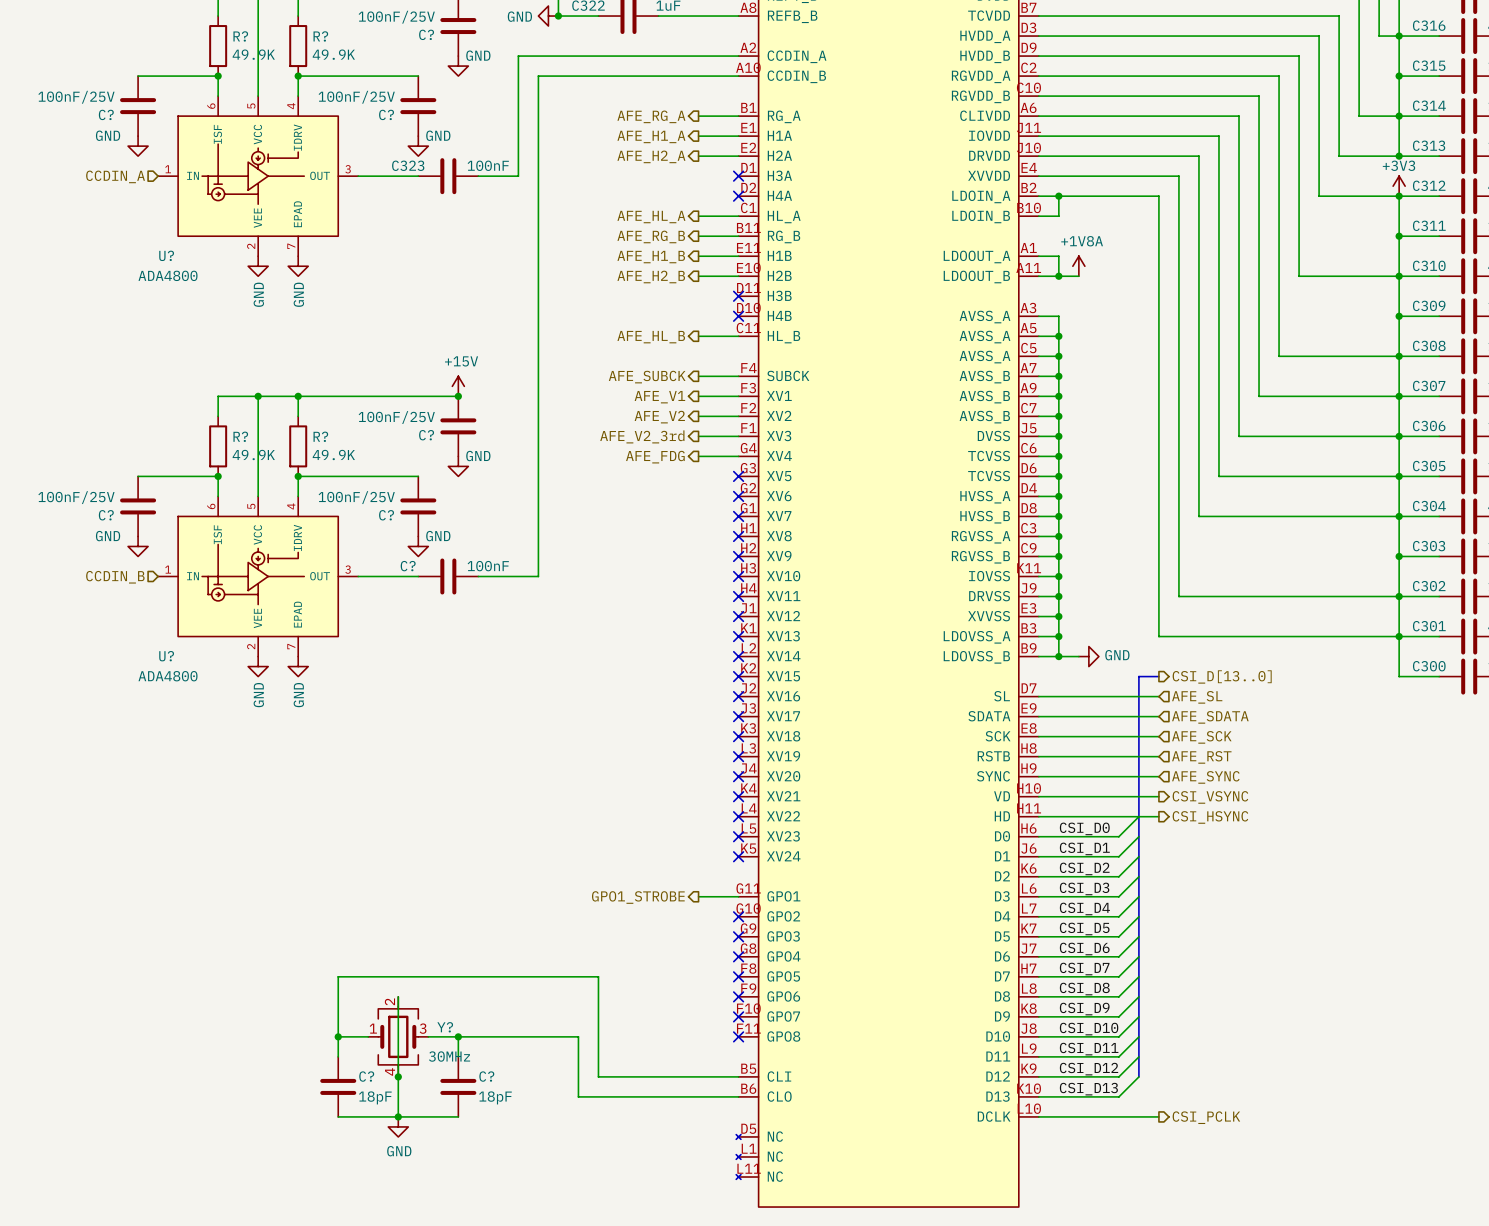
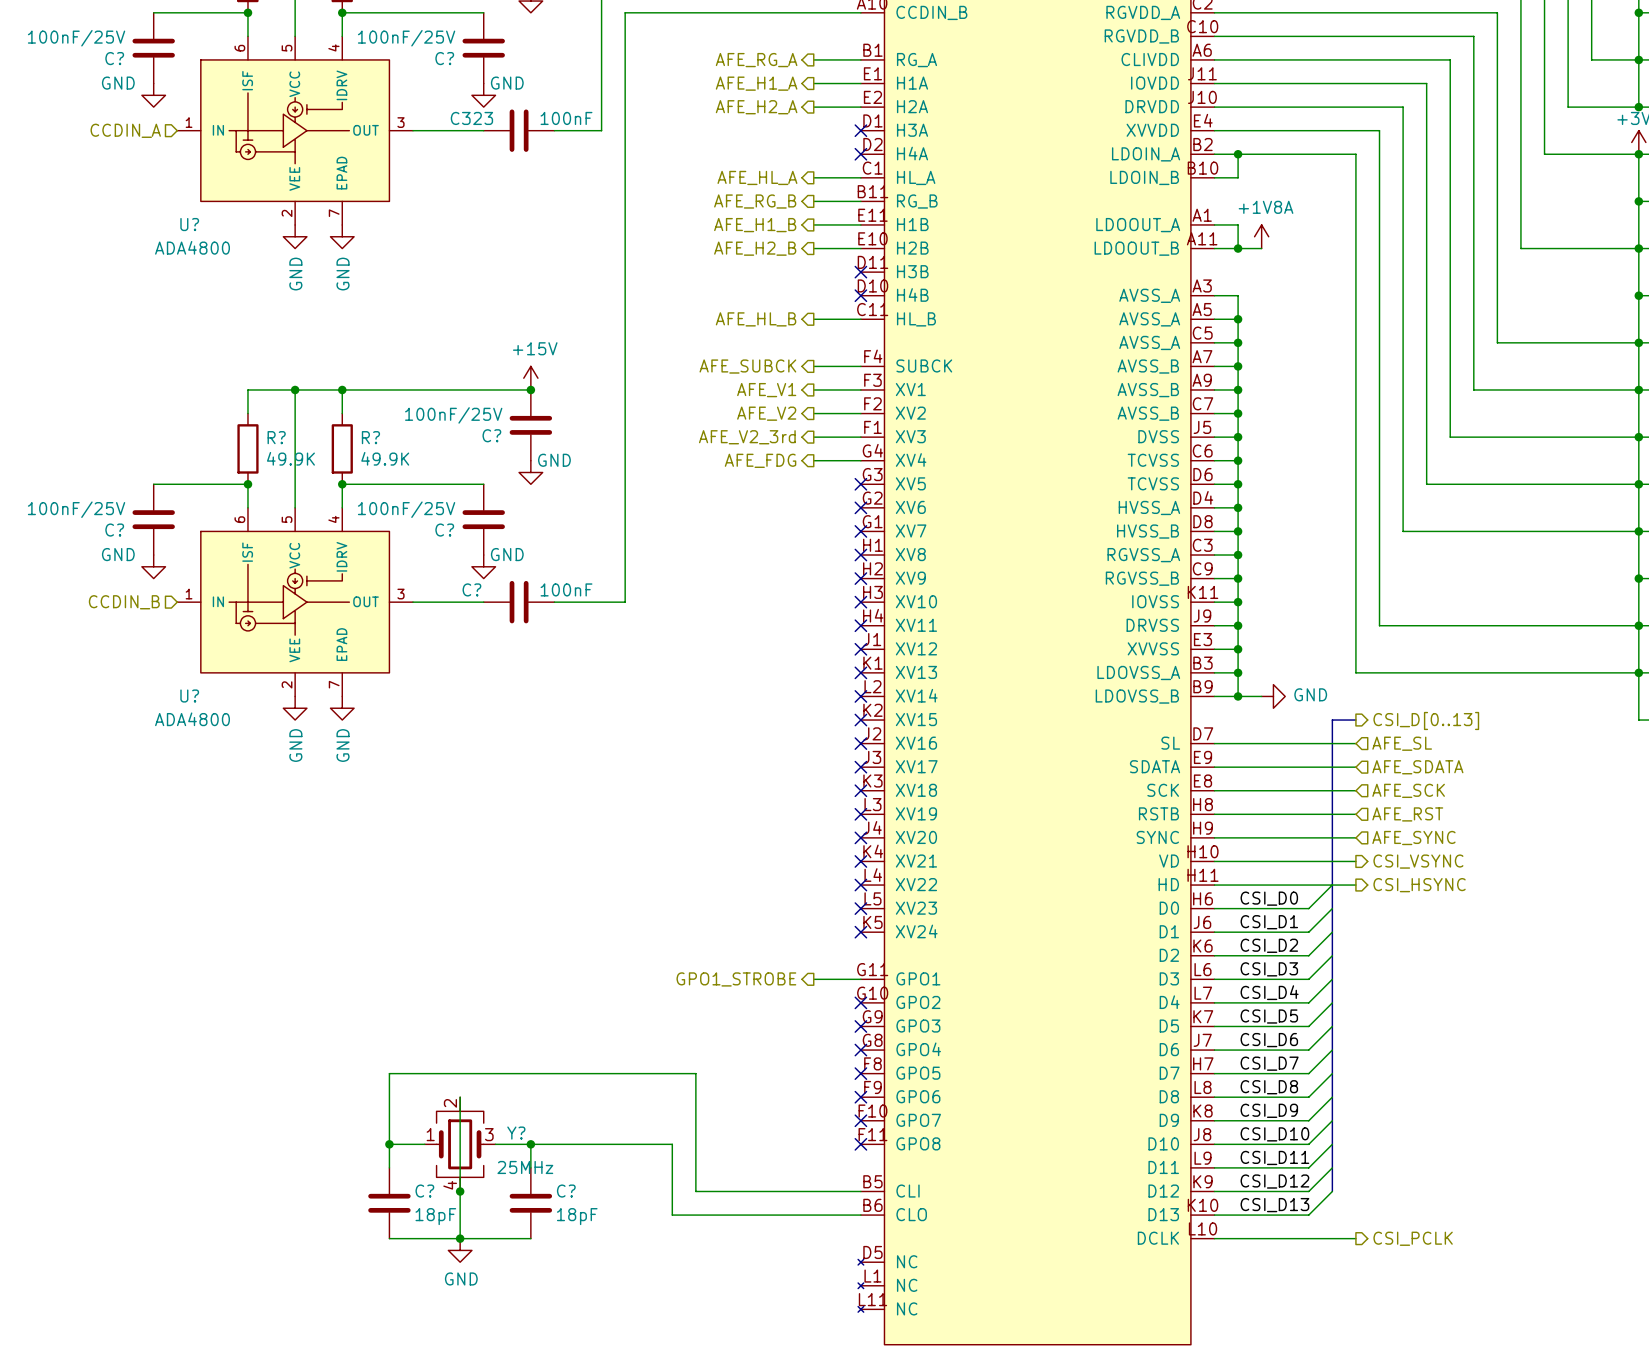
hierarchical label: CSI_D[13..0] (1222, 676) -> CSI_D[0..13] (1426, 720)
Y? value: 30MHz (449, 1056) -> 25MHz (525, 1167)

